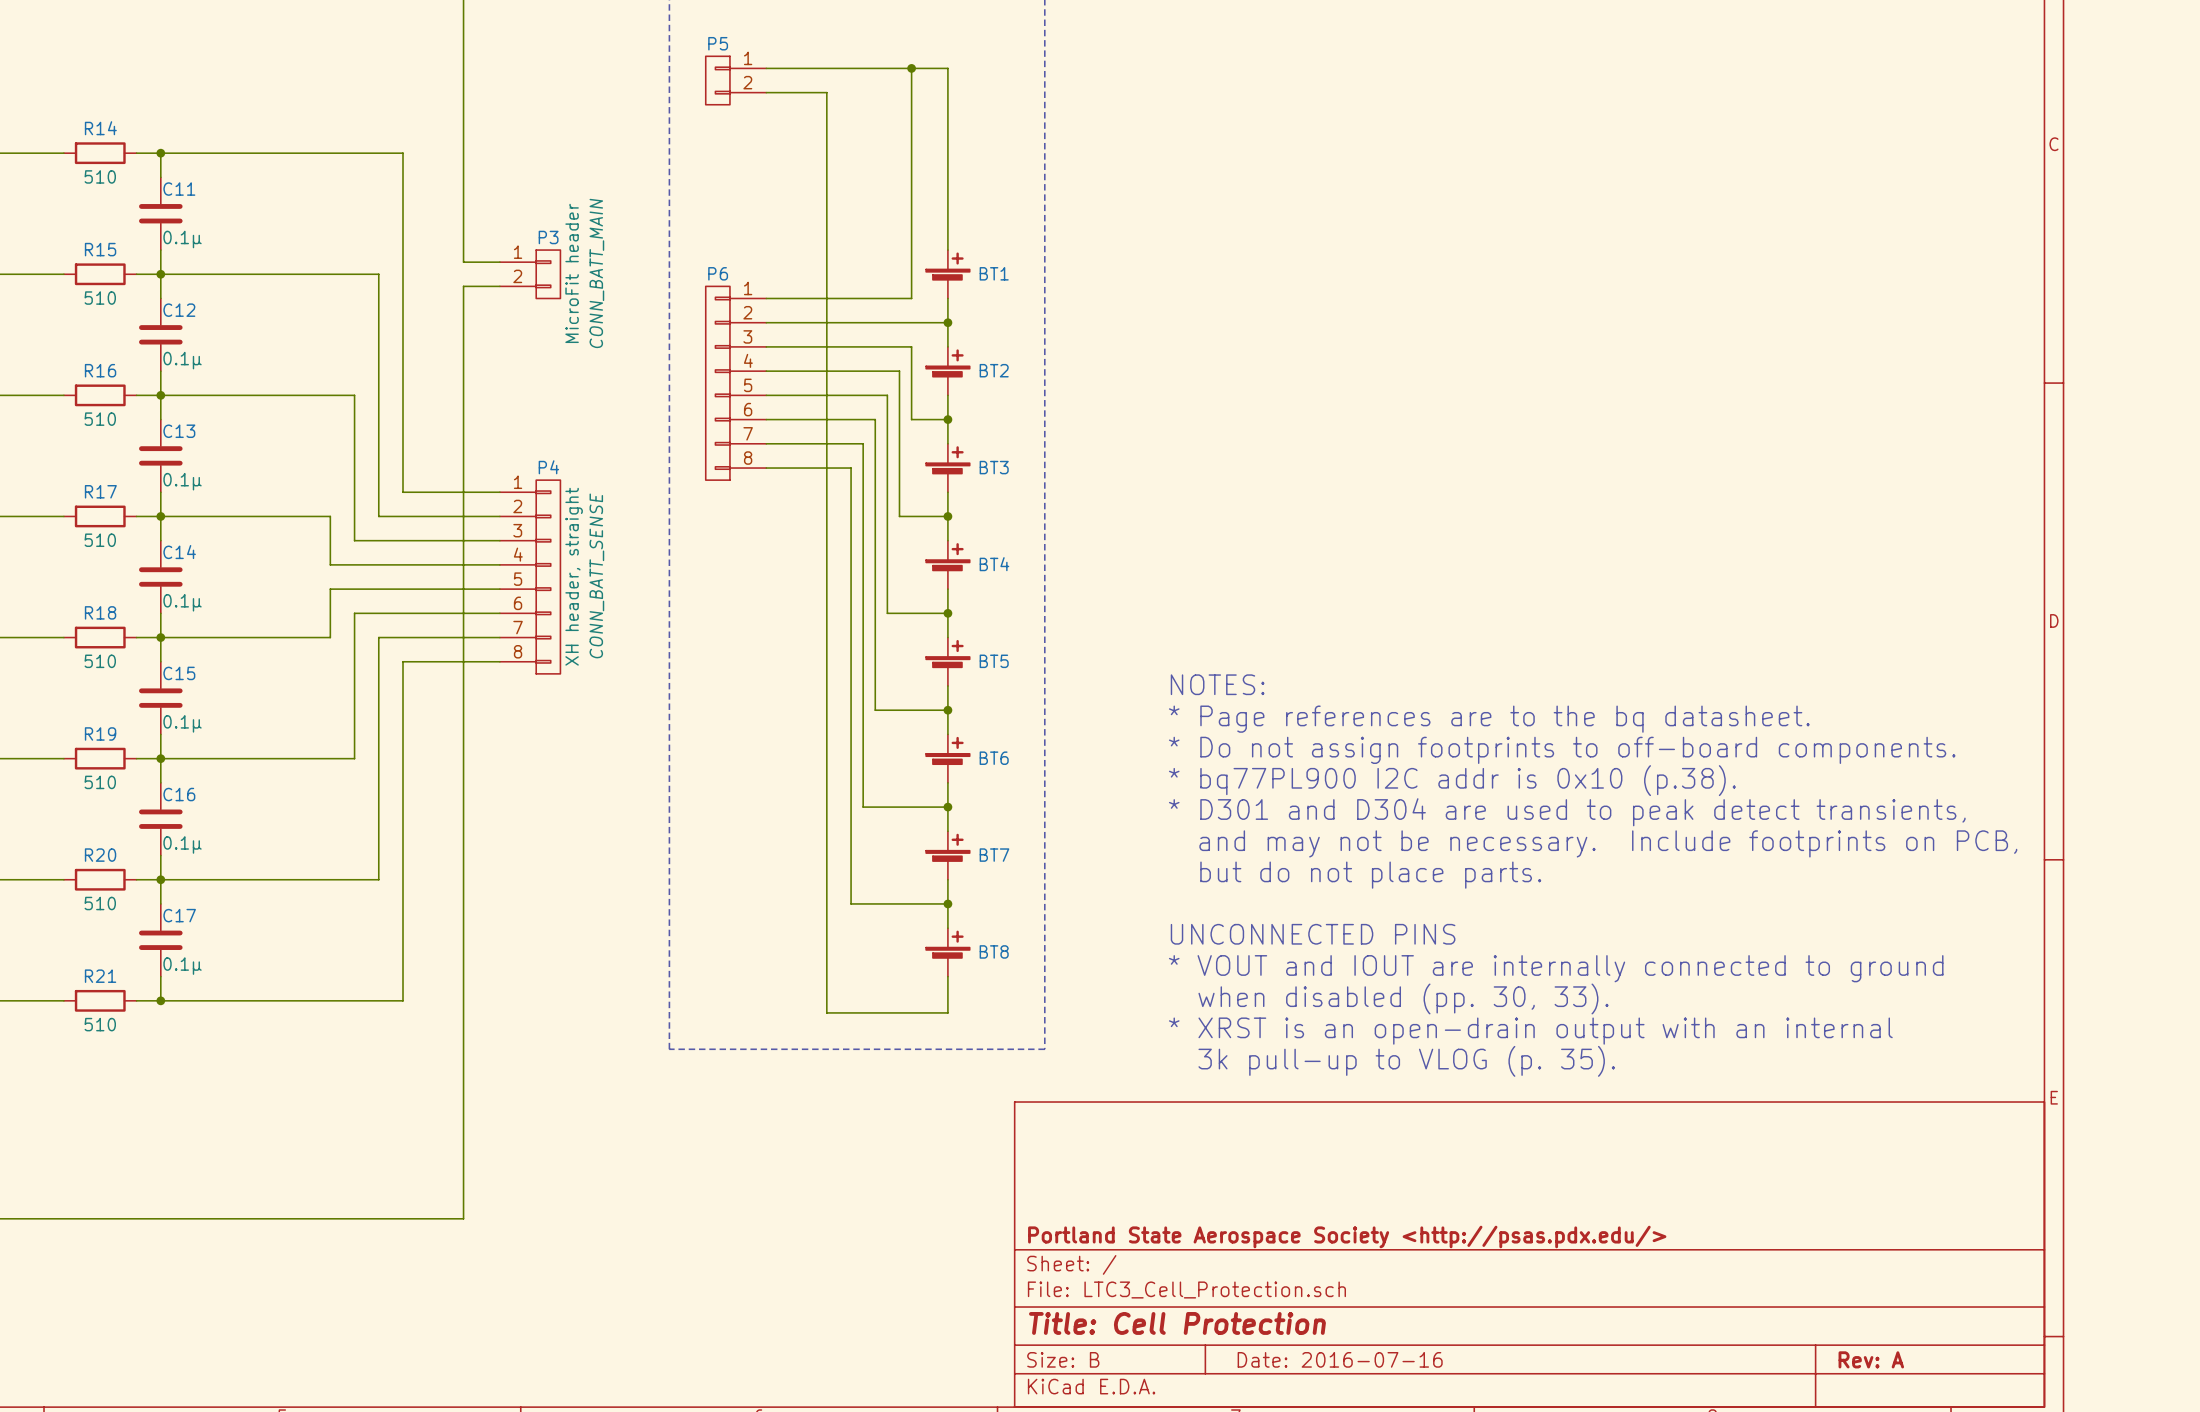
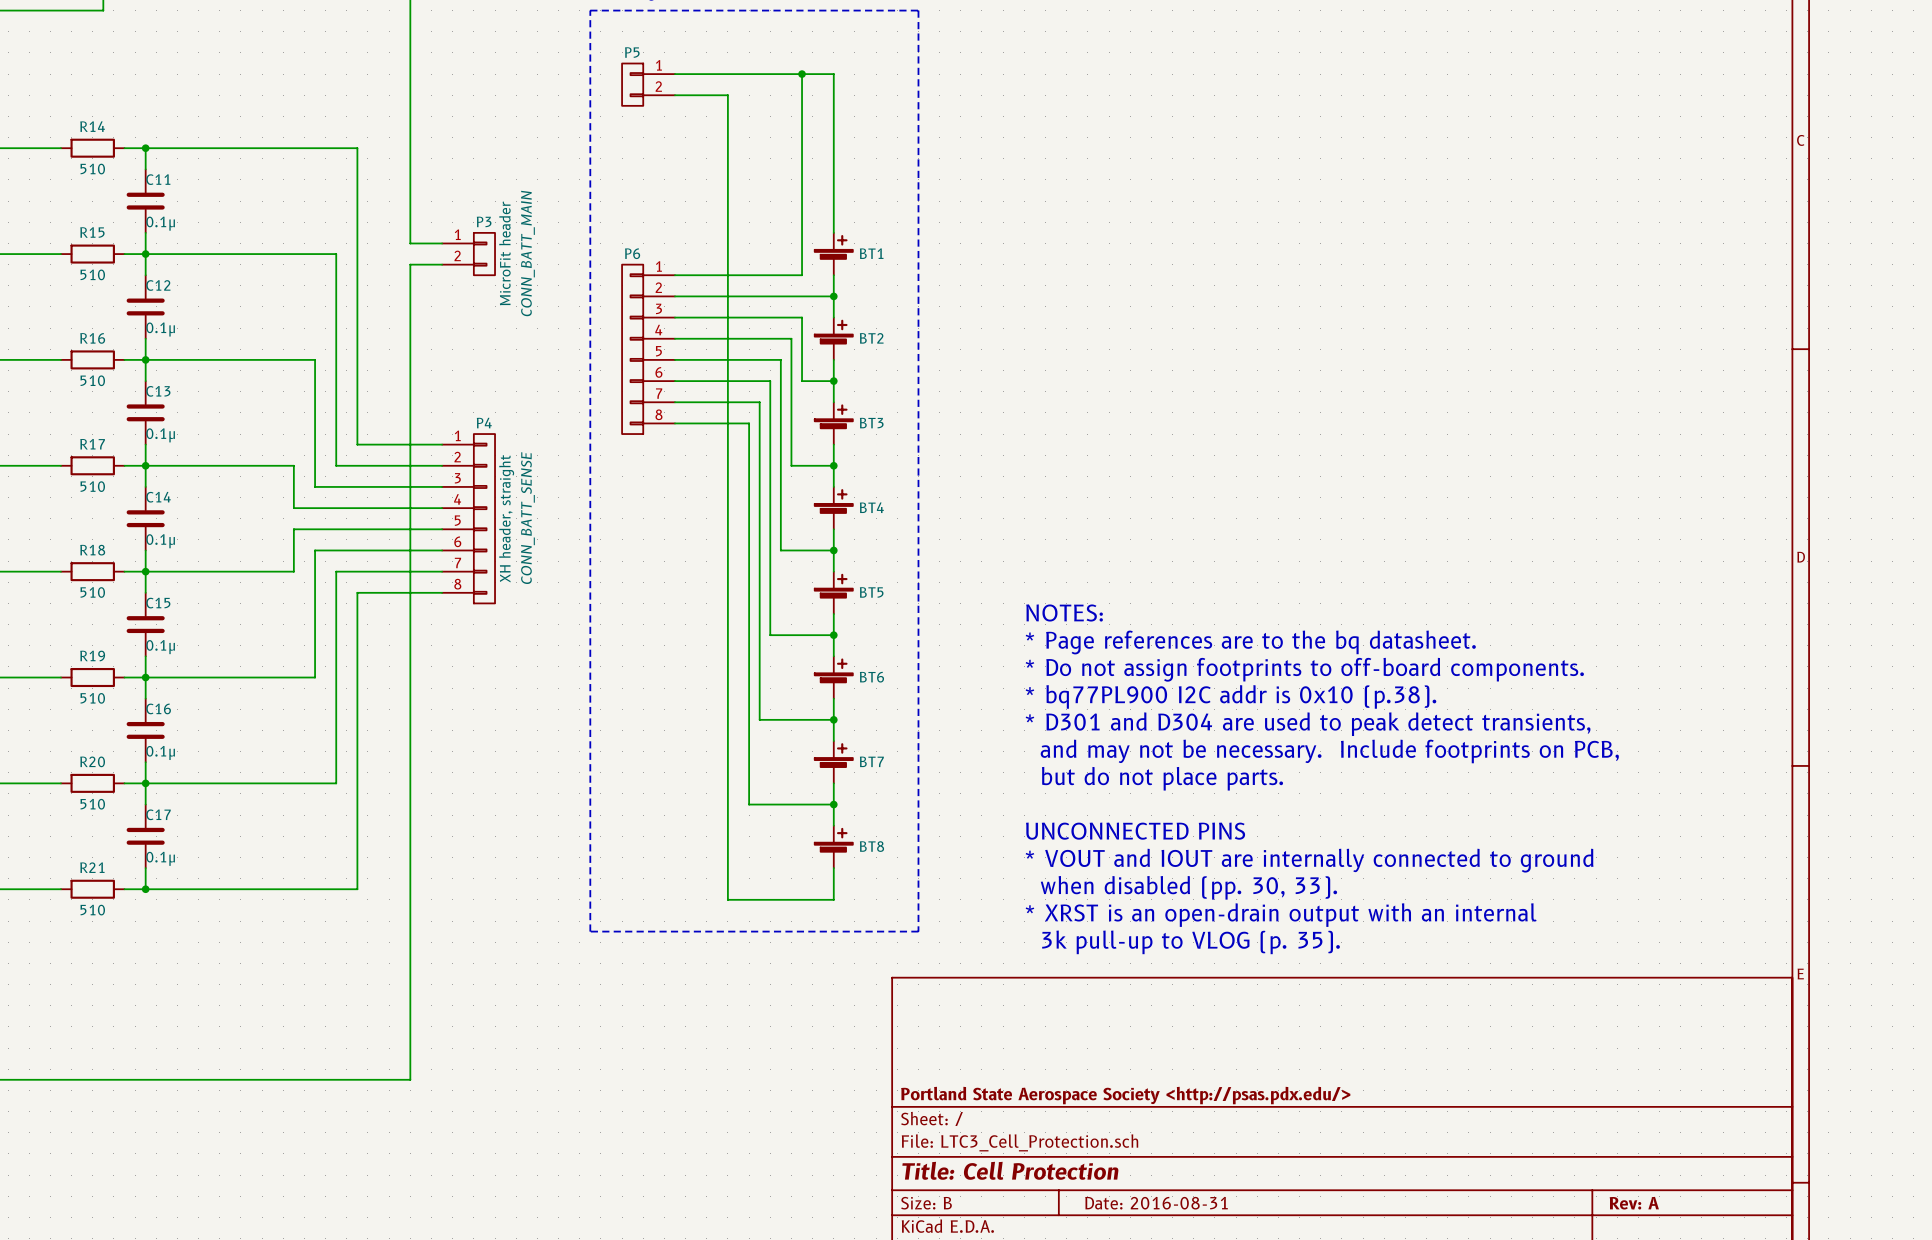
title block: Date: 2016-07-16 (1340, 1359) -> Date: 2016-08-31 (1156, 1203)

